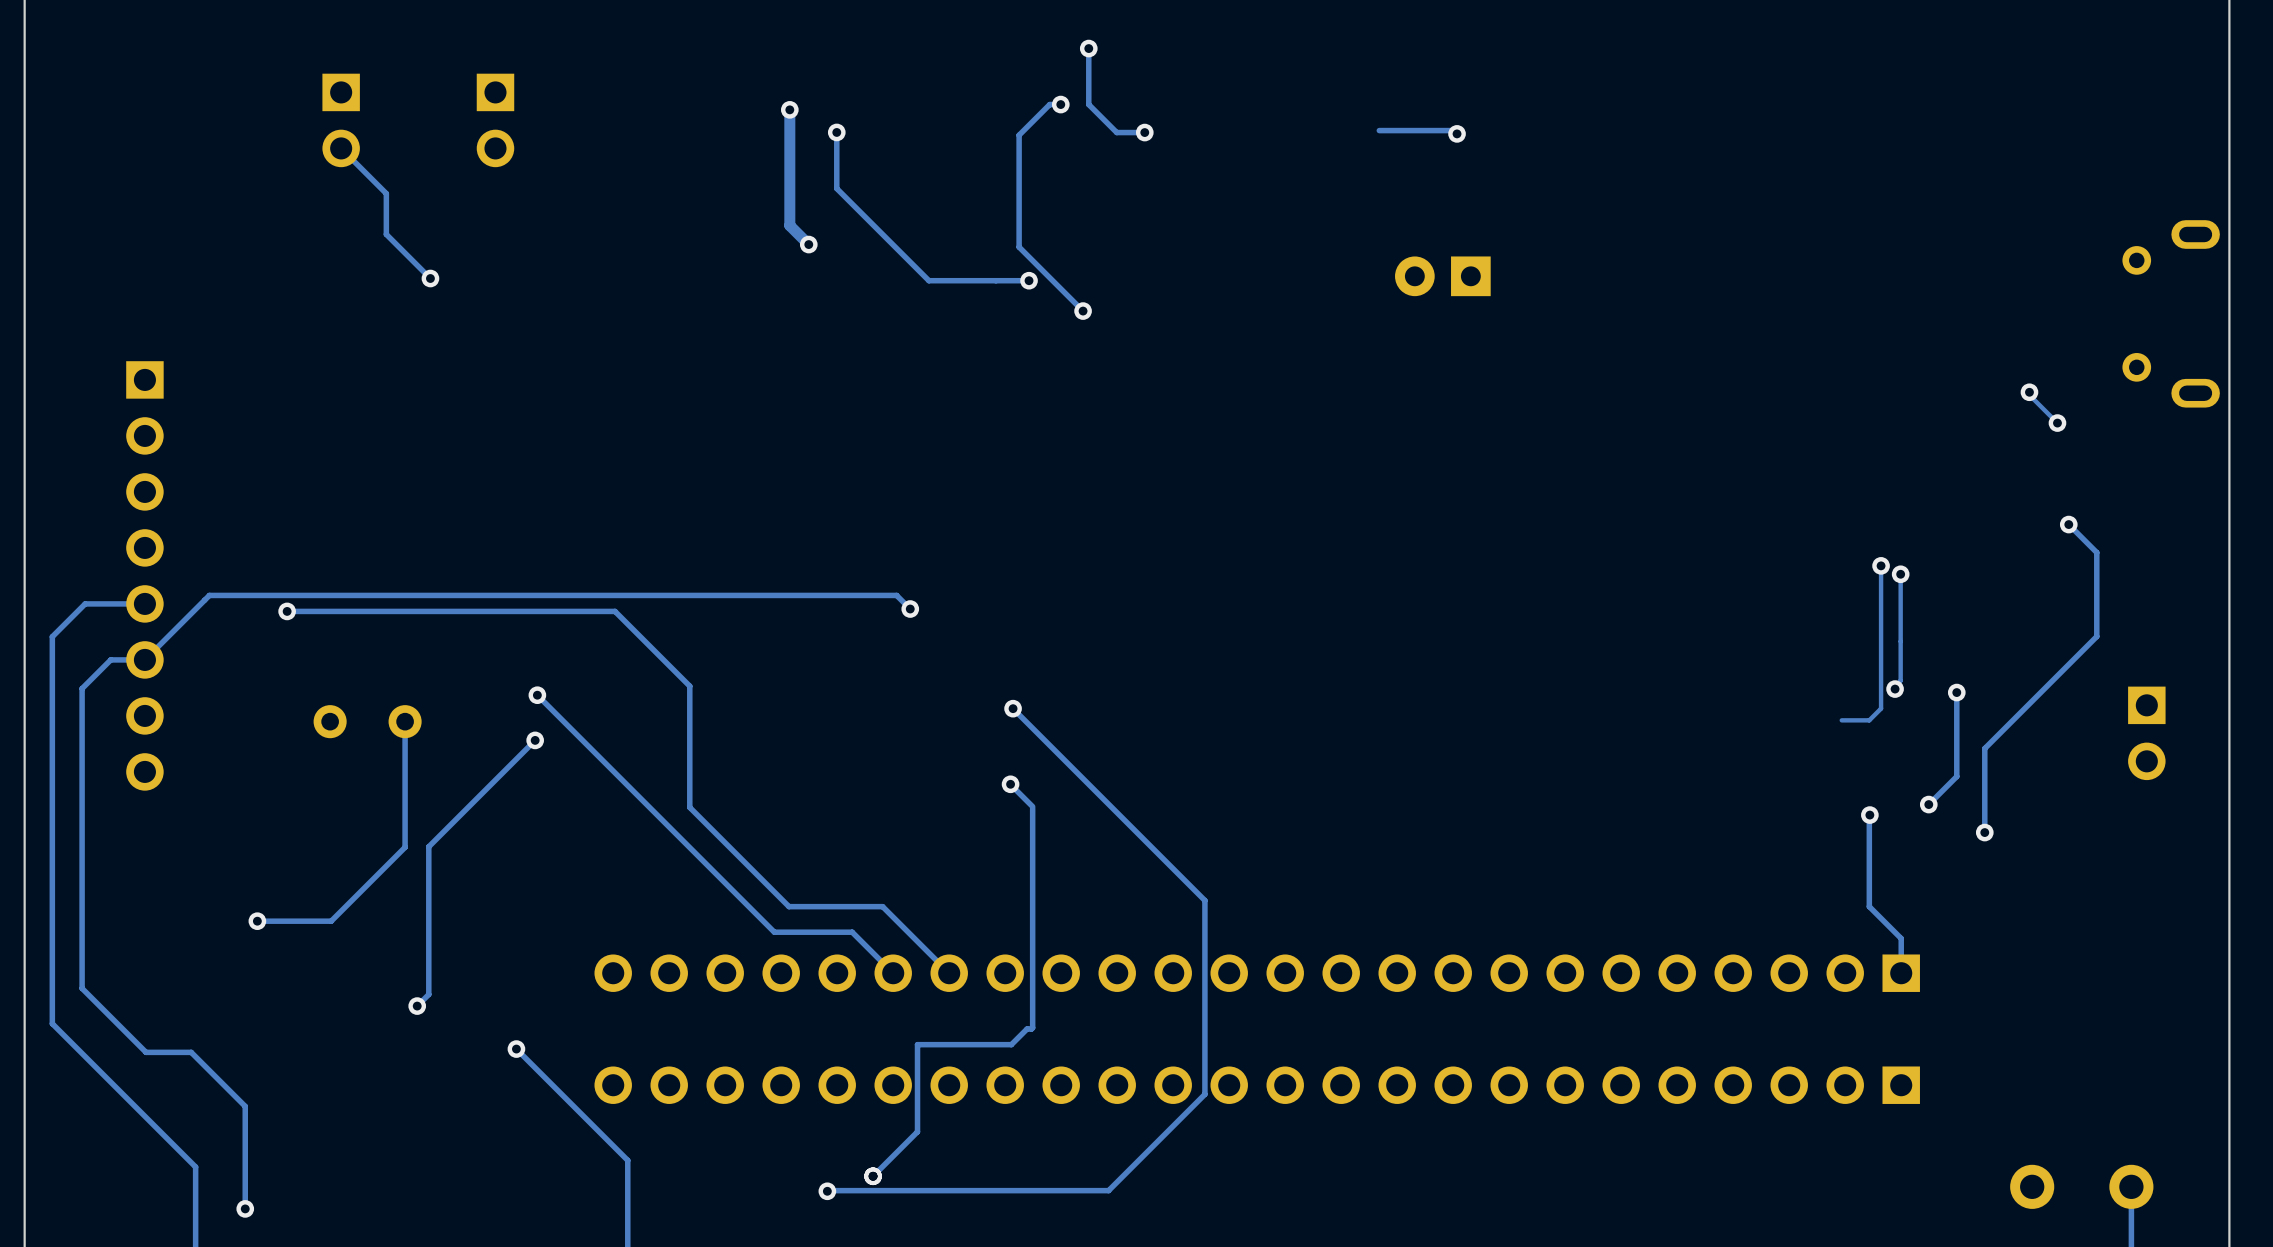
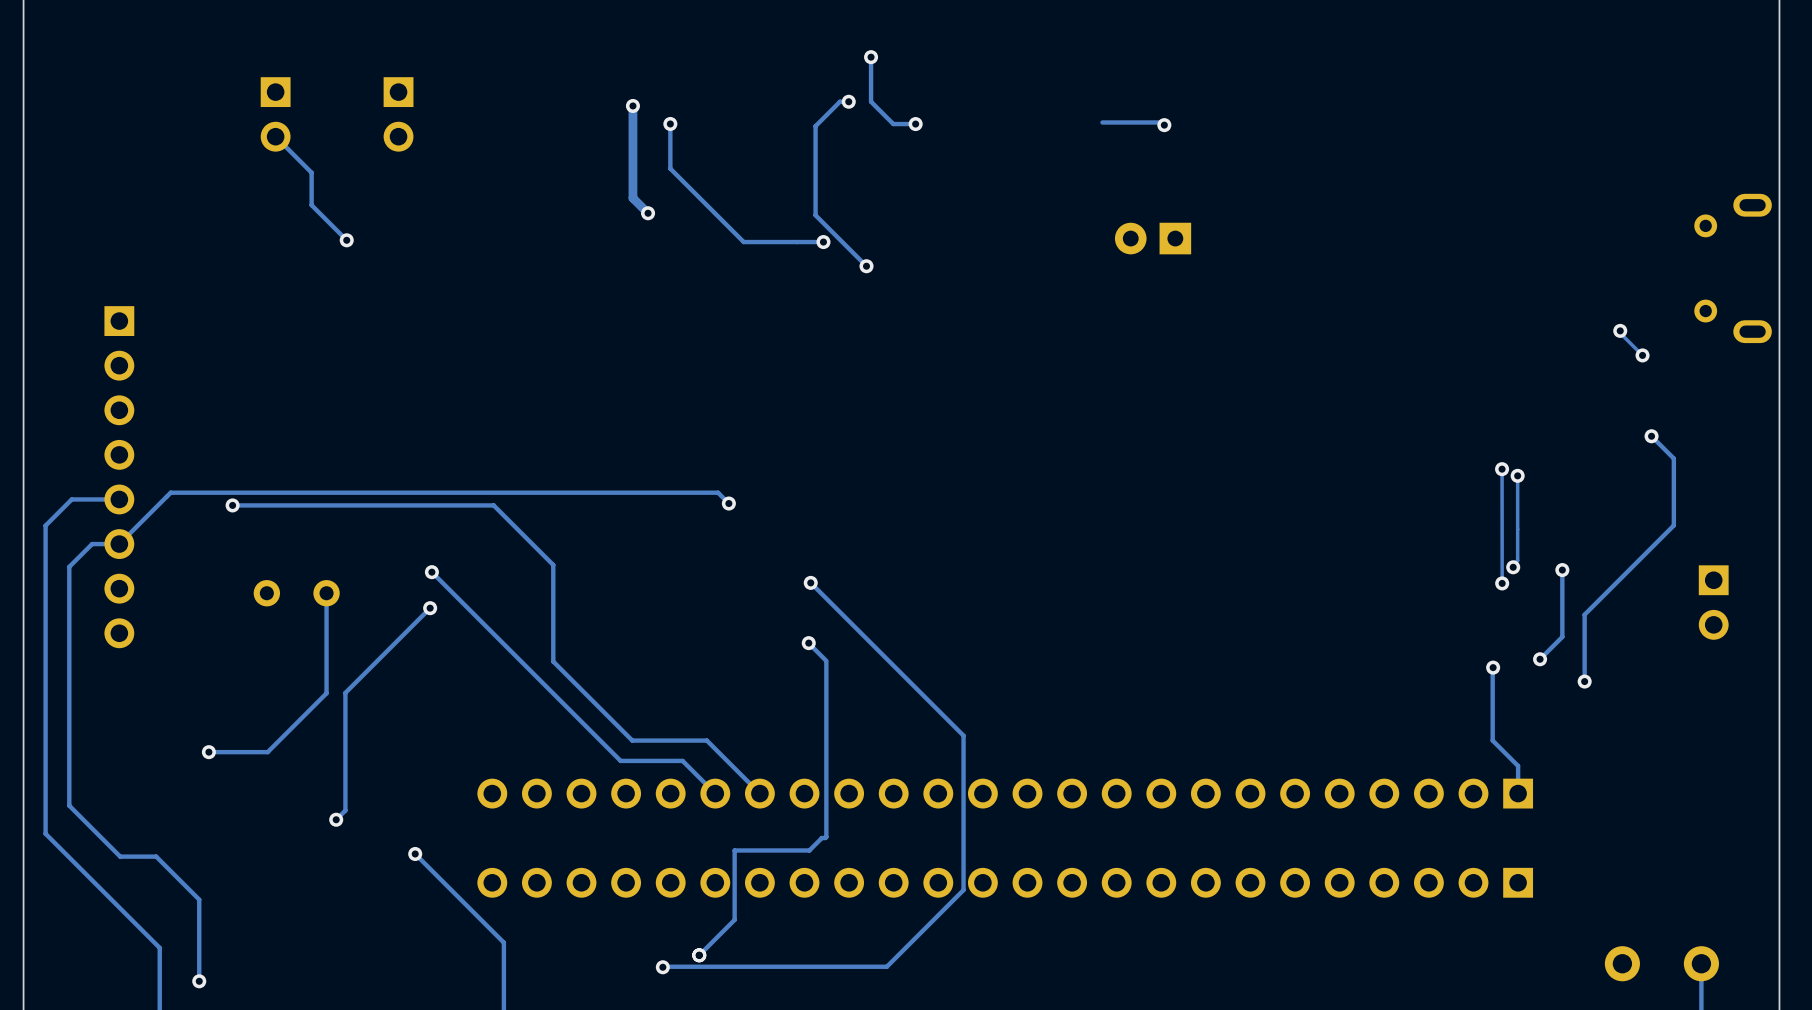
track: (1881, 565) (1881, 708) (1869, 720) (1841, 720) -> (1502, 469) (1502, 583)
via: none -> (1502, 583)

